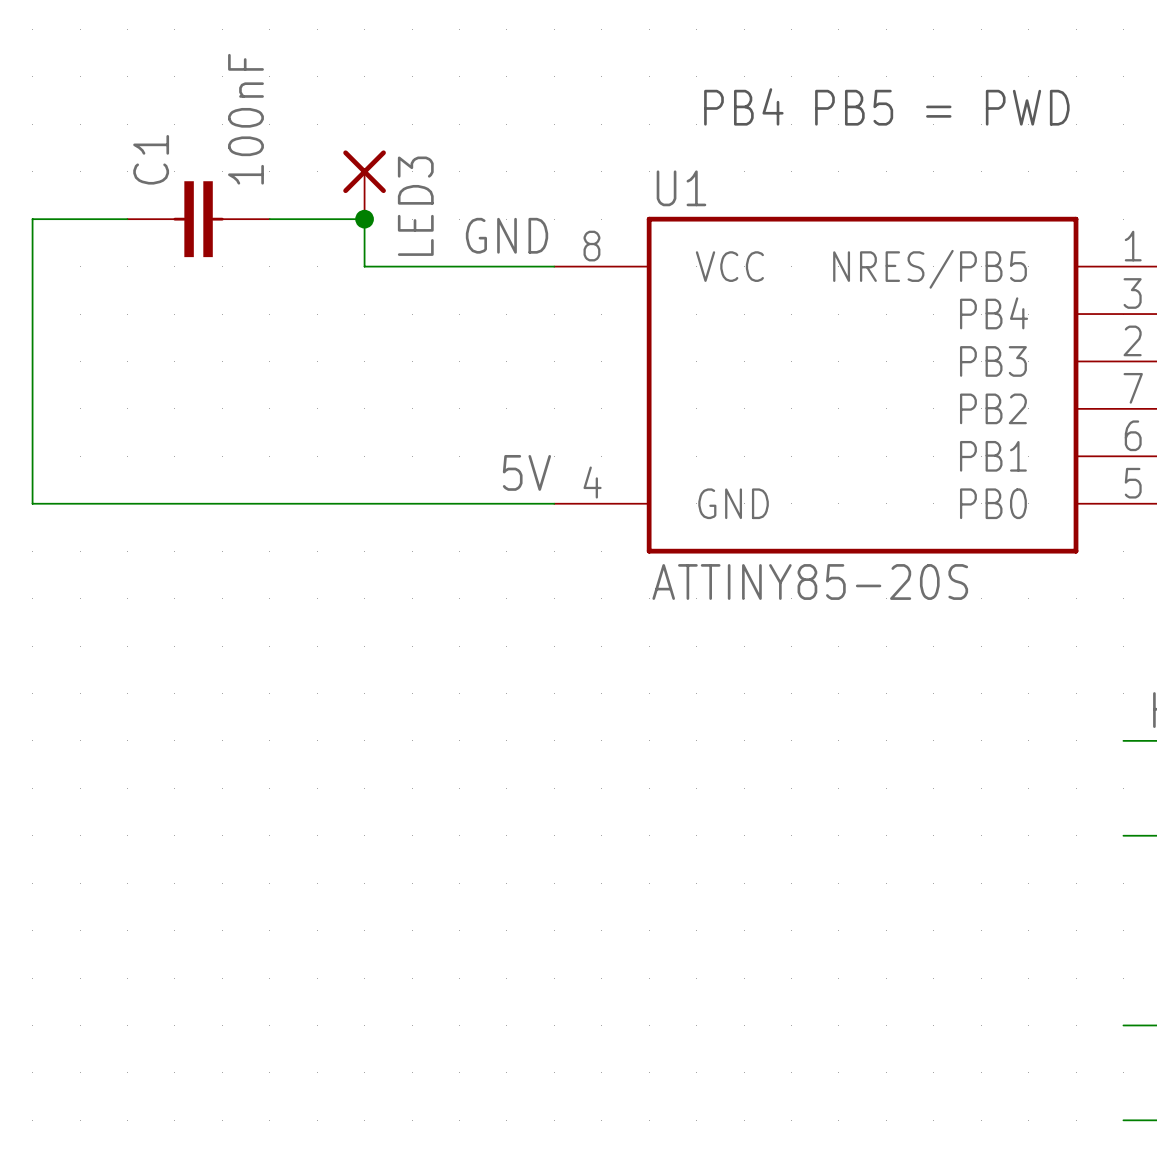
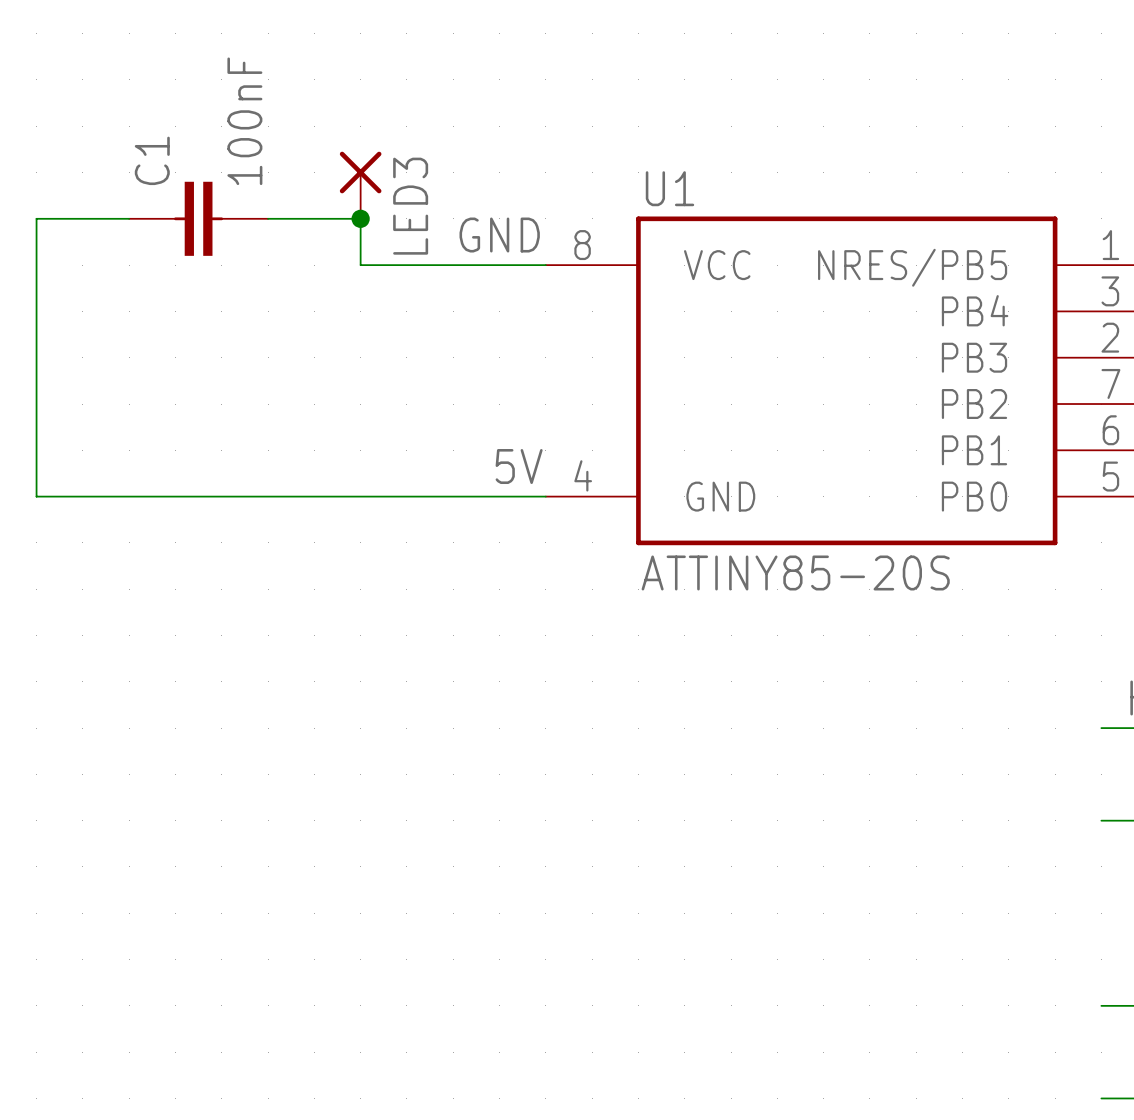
text: PB4 PB5 = PWD (886, 106) -> none

